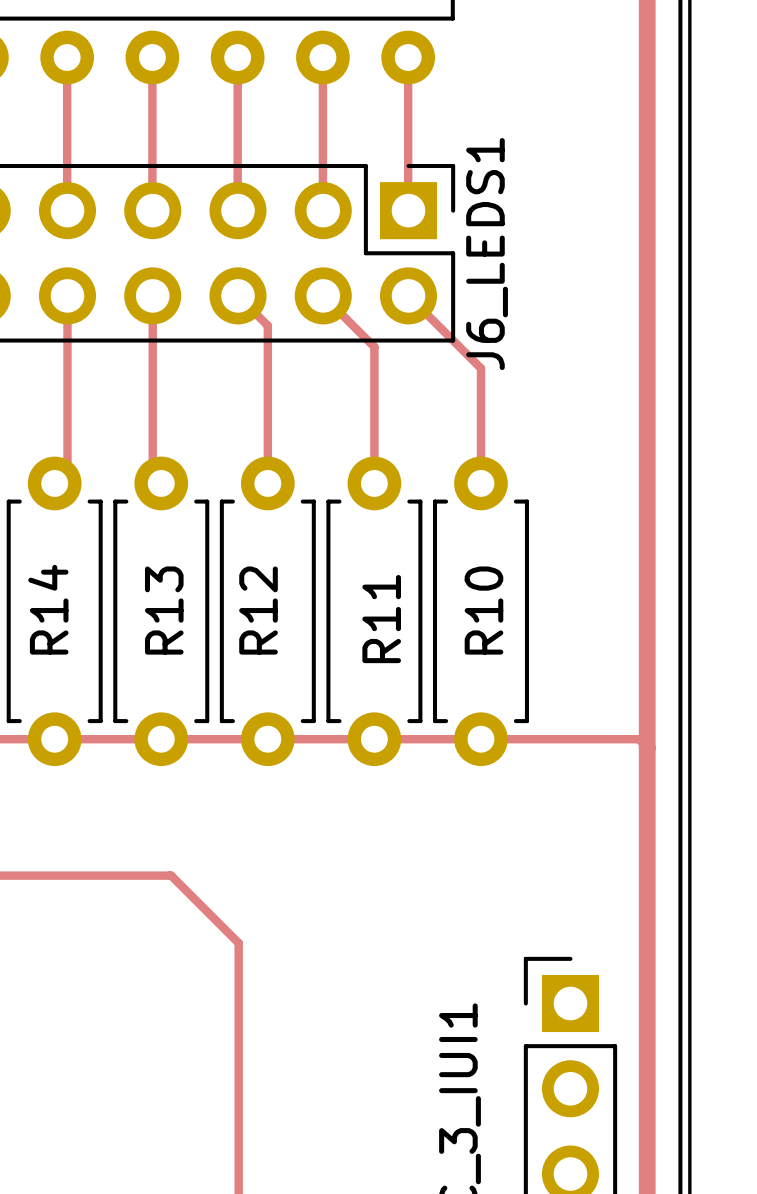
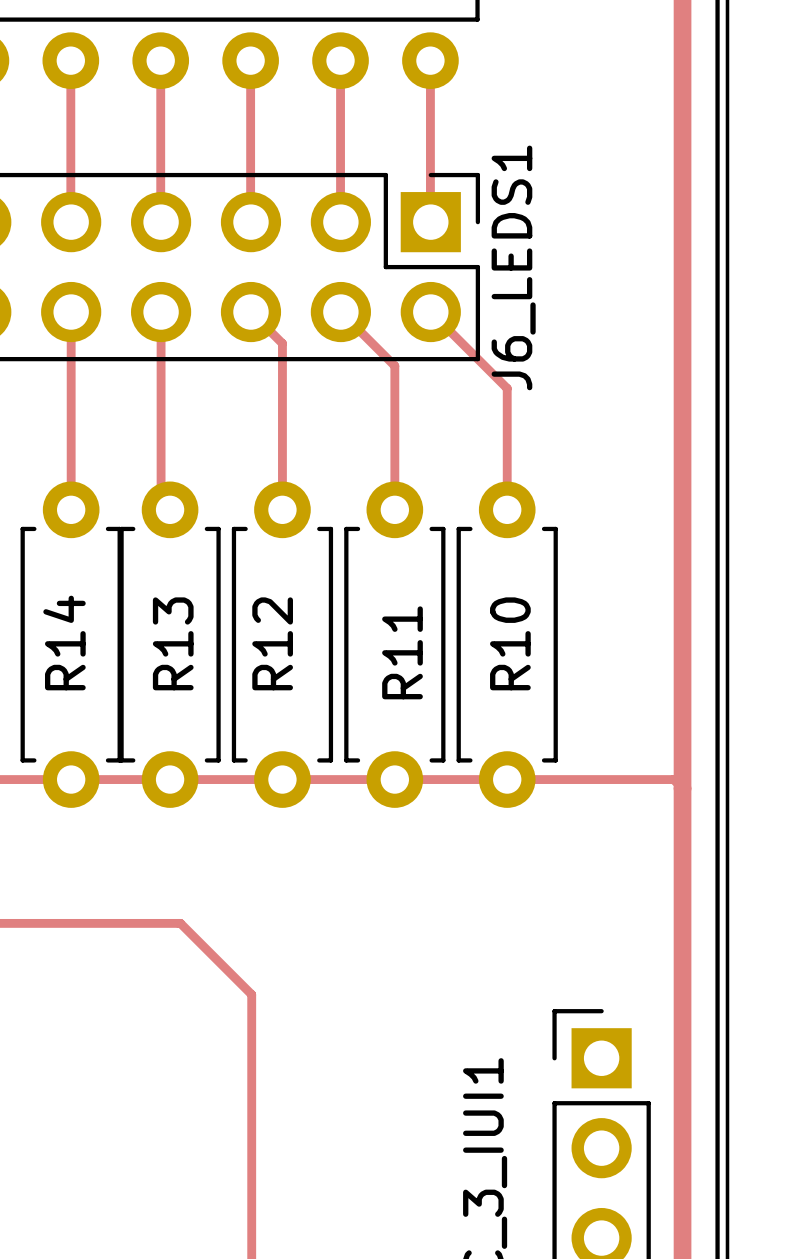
R14 position: (54, 611) -> (71, 644)

